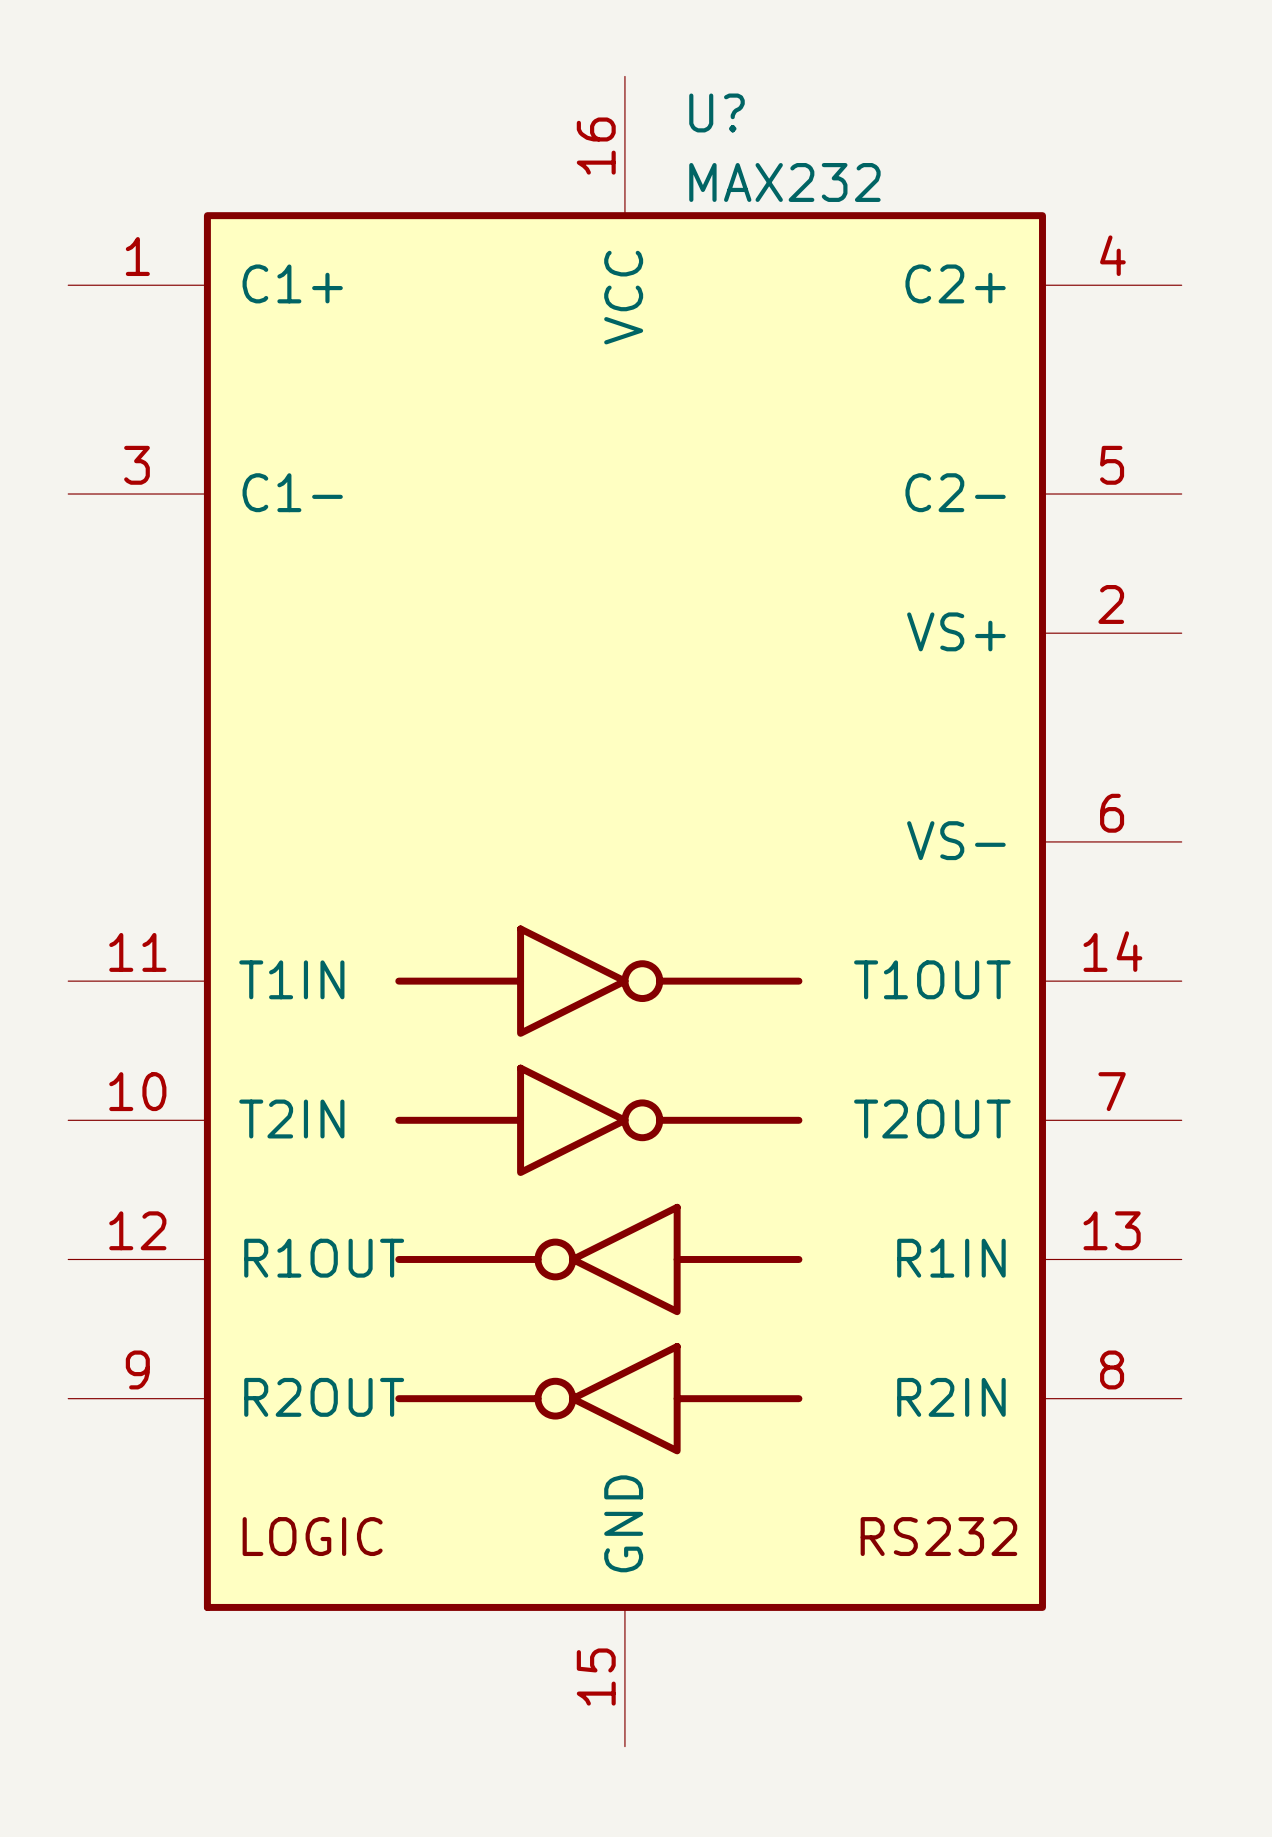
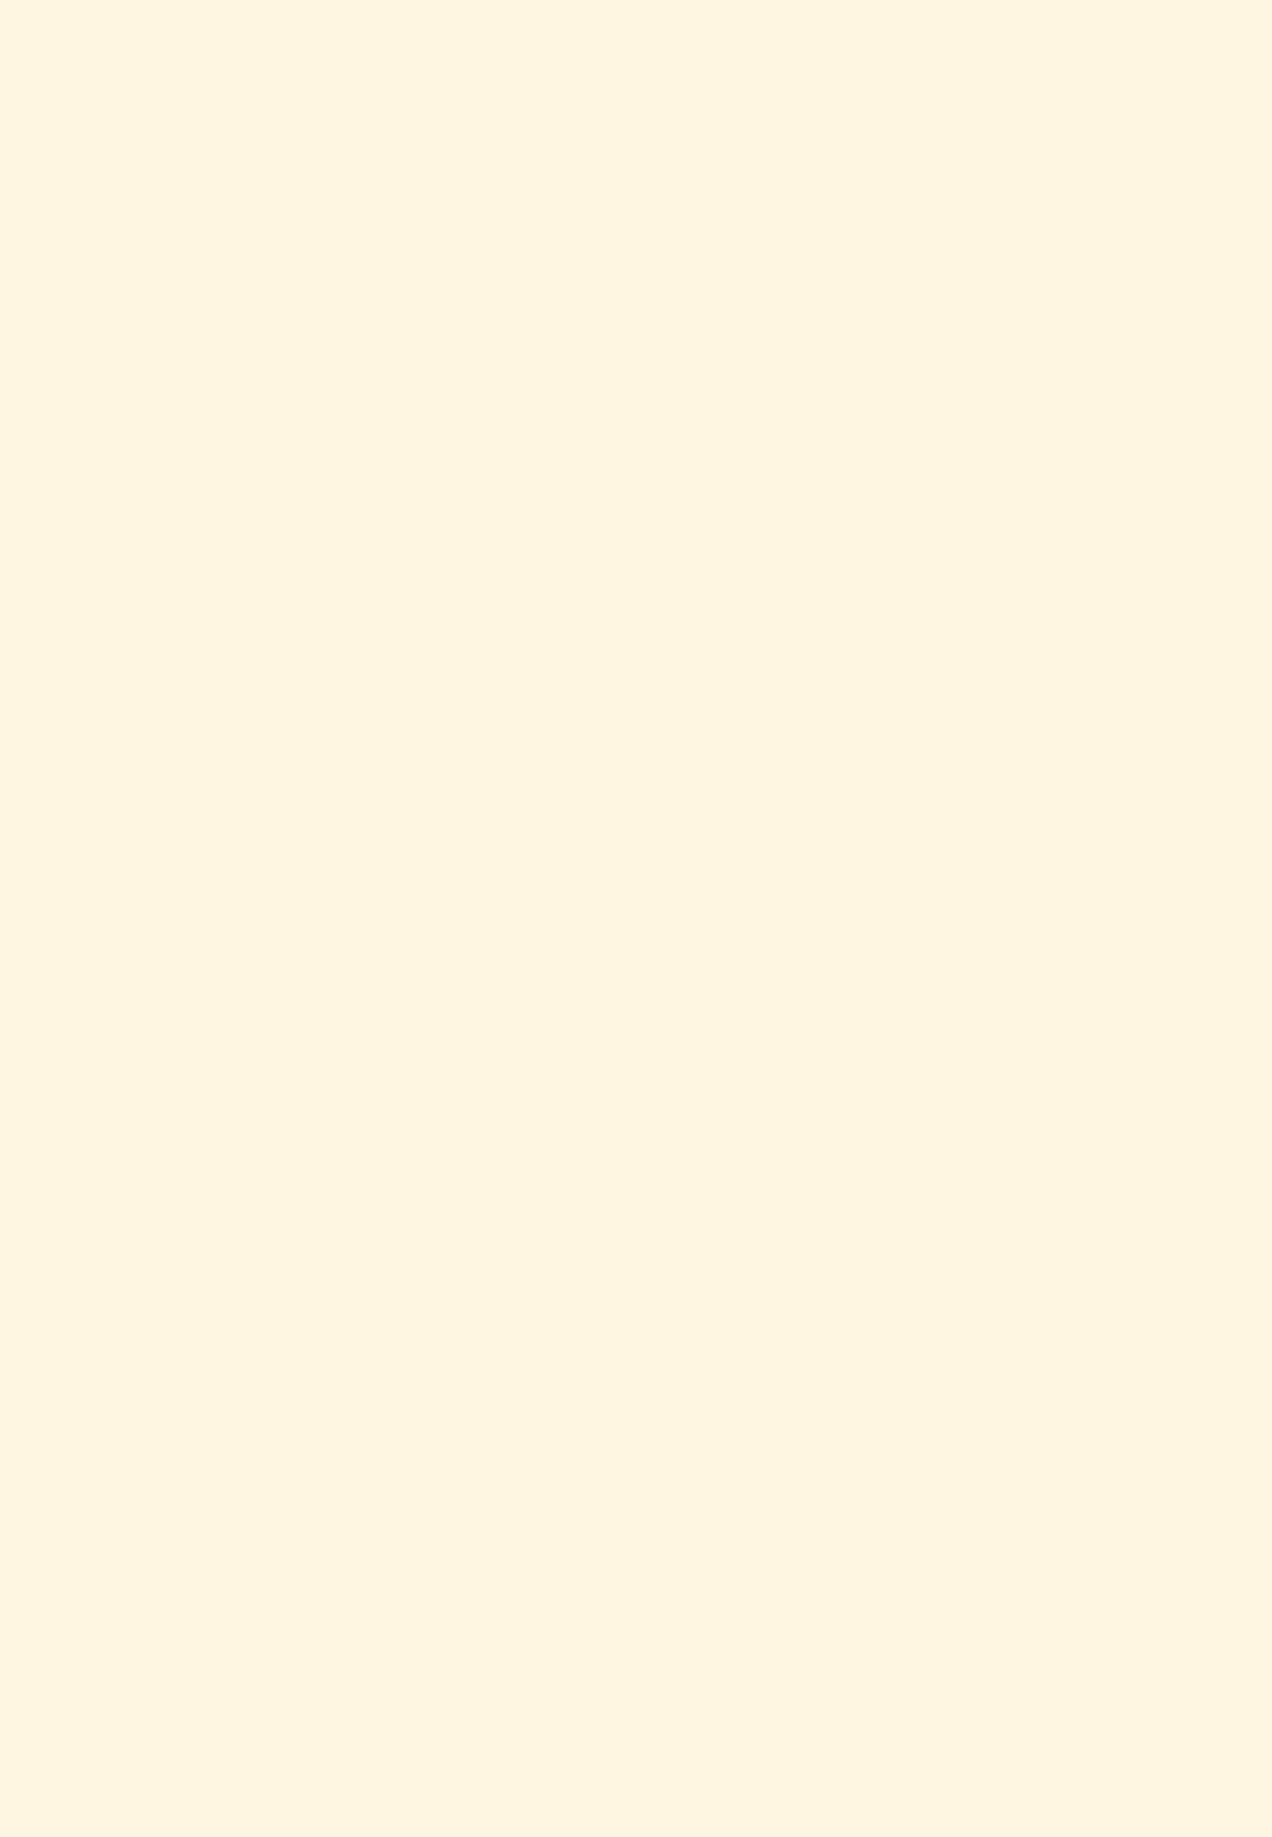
U?: MAX232 (624, 911) -> none

